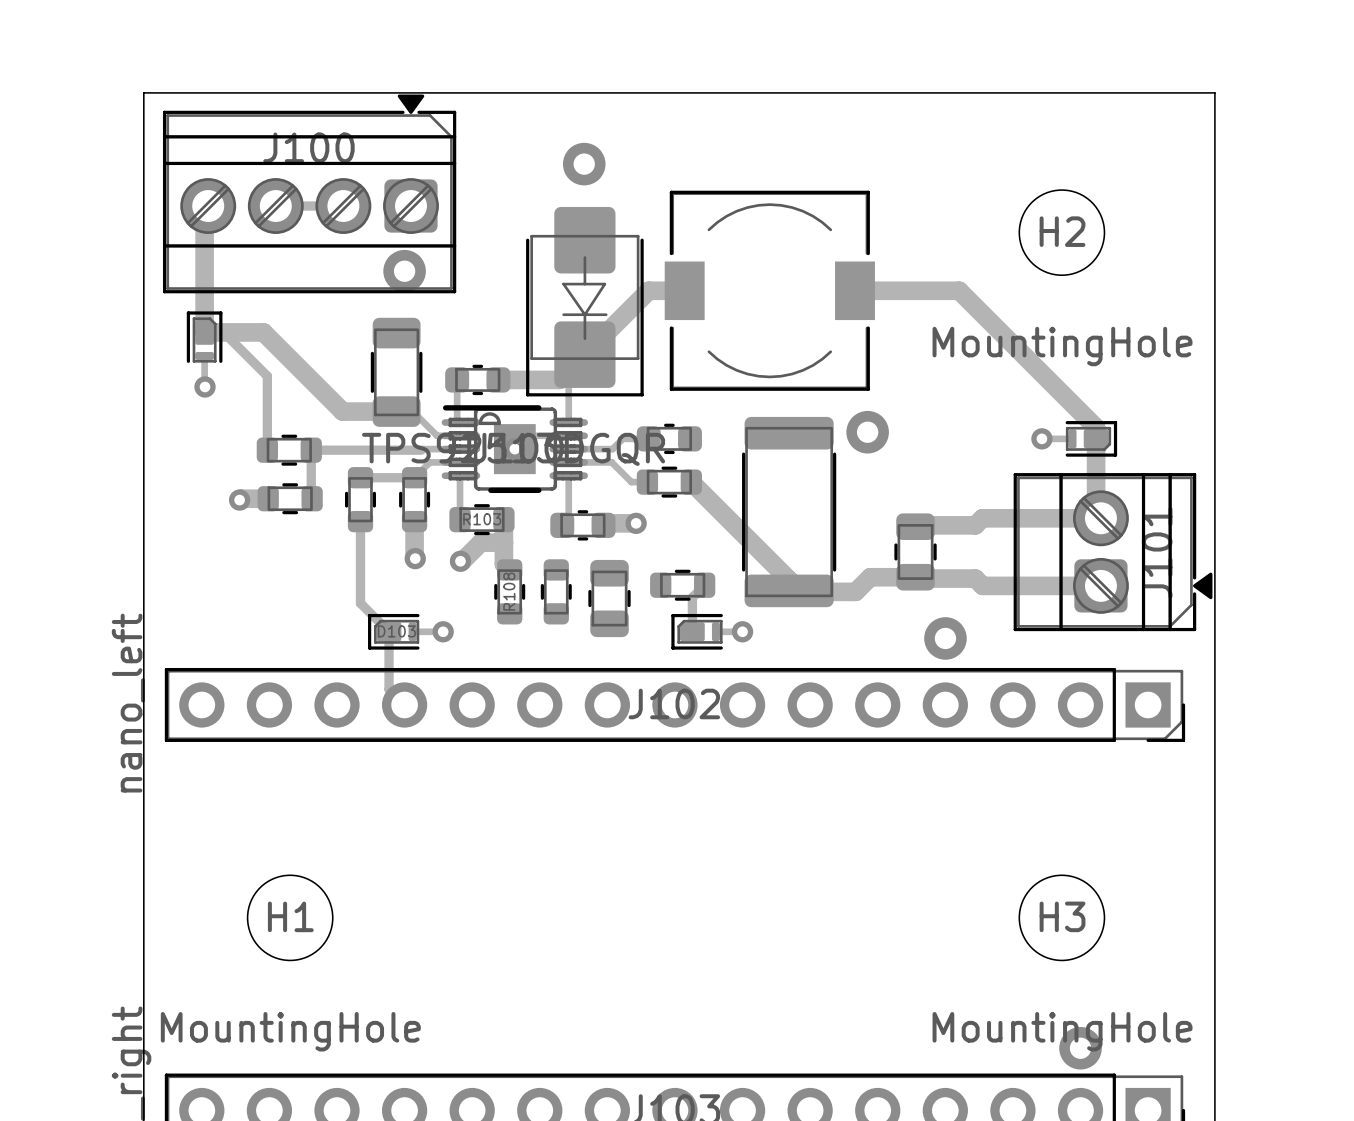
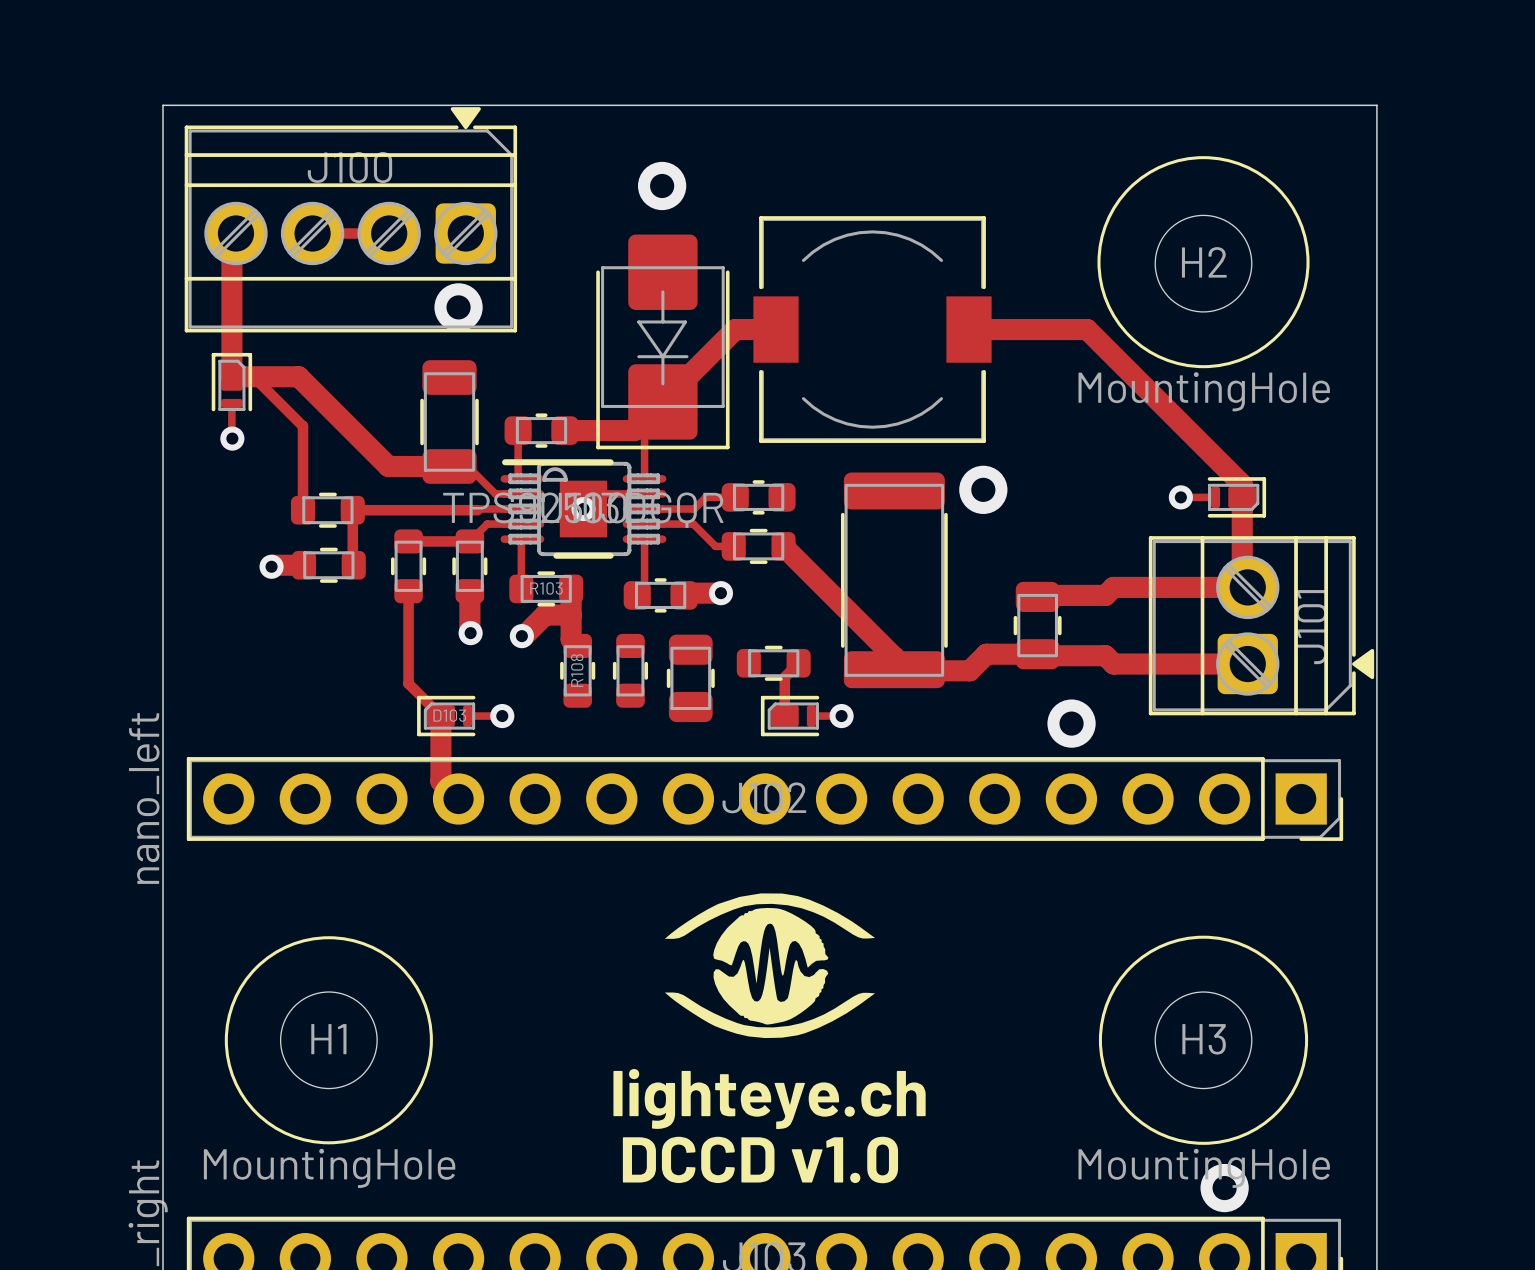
drawing: none -> [1097, 156, 1310, 369]
track width: thin (389, 631) (389, 689) (404, 704) -> thick (440, 716) (440, 781) (458, 798)
drawing: none -> [664, 893, 876, 1039]
drawing: none -> [1098, 935, 1309, 1145]
drawing: none -> [224, 936, 433, 1145]
text: none -> lighteye.ch (769, 1099)
text: none -> DCCD v1.0 (760, 1159)

